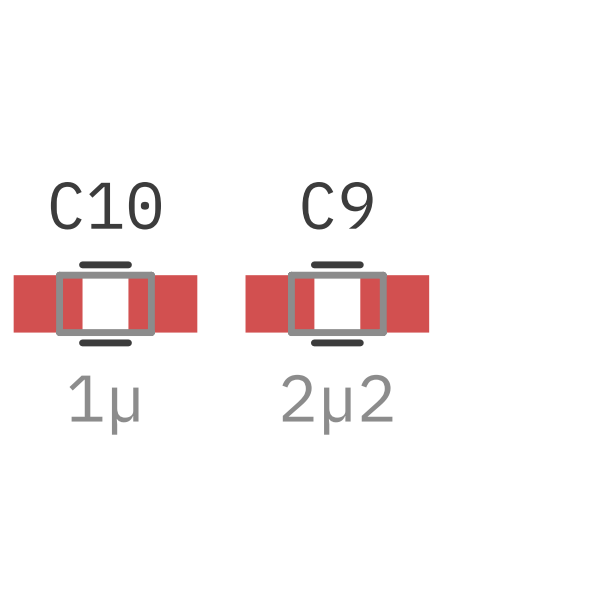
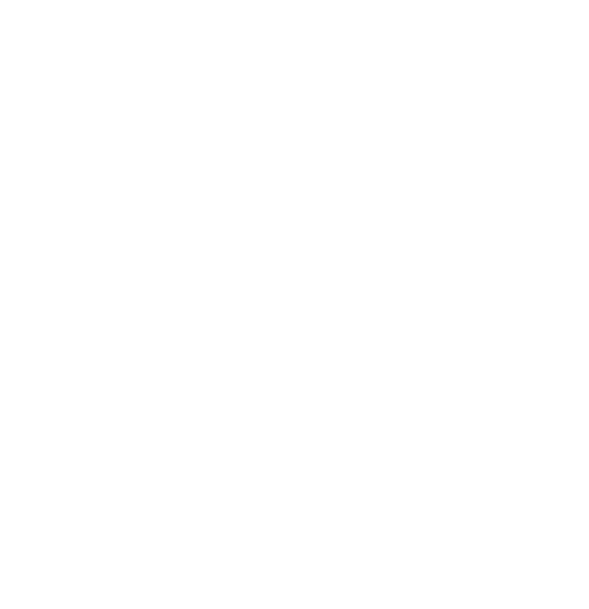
C10: 1µ (105, 303) -> none
C9: 2µ2 (337, 303) -> none

